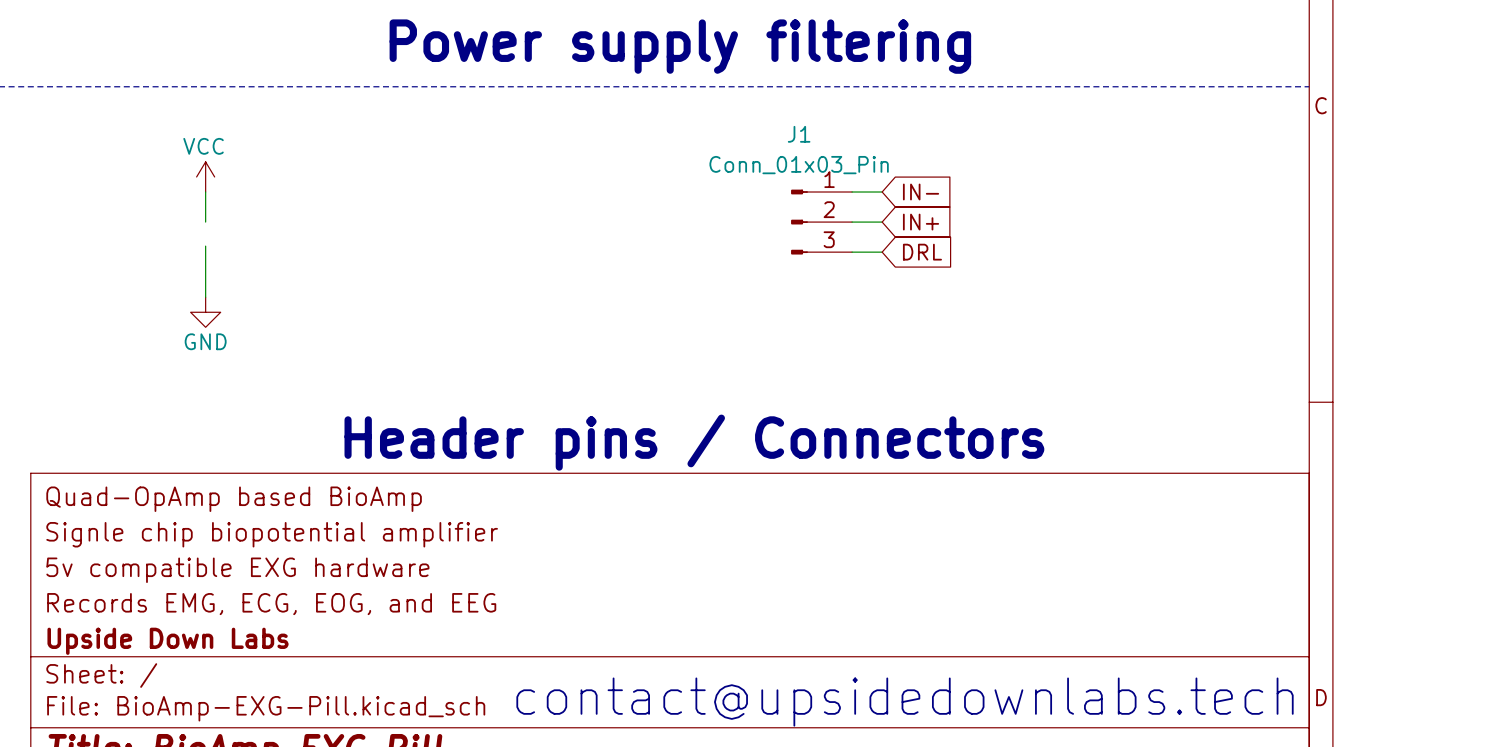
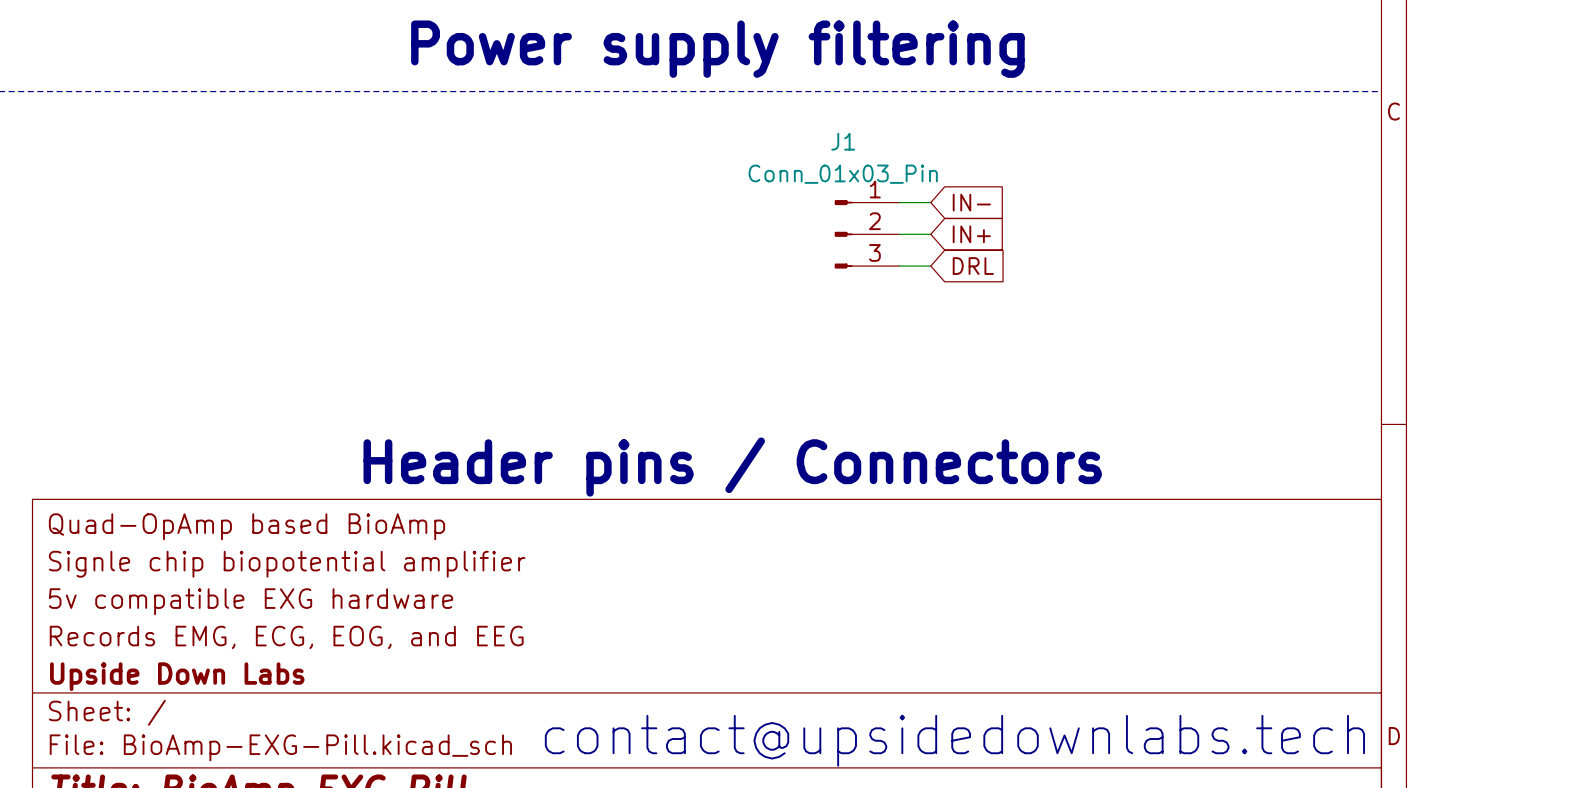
power symbol: VCC (205, 176) -> none
wire: (205, 192) (205, 222) -> none
wire: (205, 246) (205, 297) -> none
power symbol: GND (205, 312) -> none

